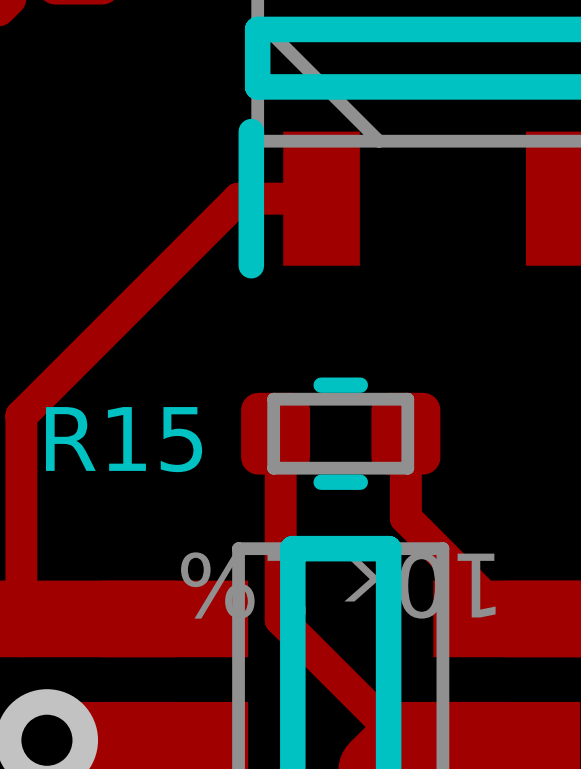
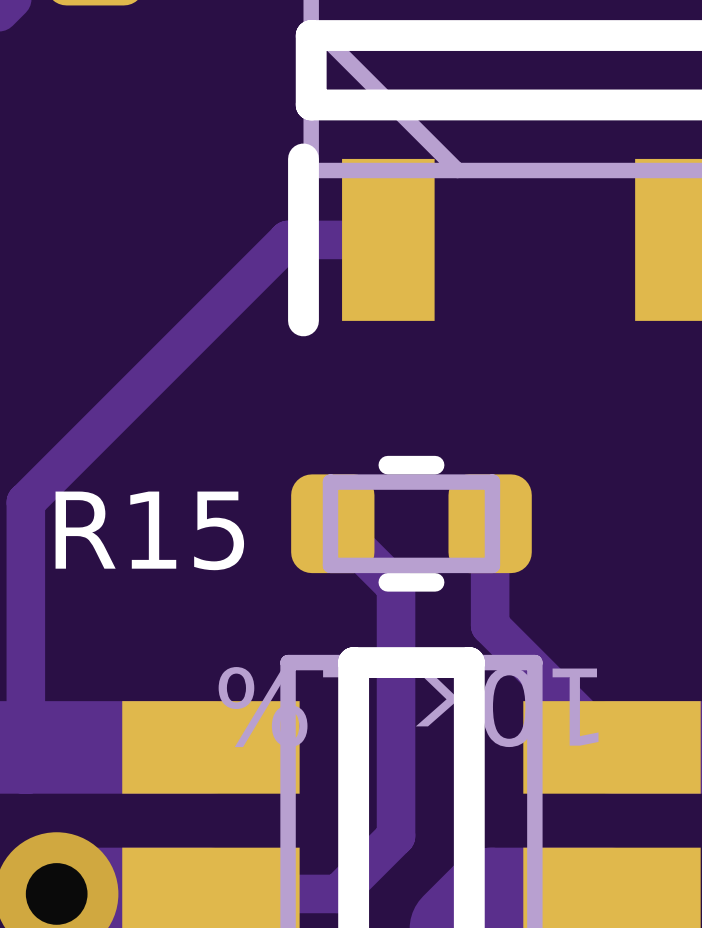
track: (280, 438) (280, 619) (401, 740) -> (338, 529) (396, 586) (396, 836) (338, 893) (210, 893)

